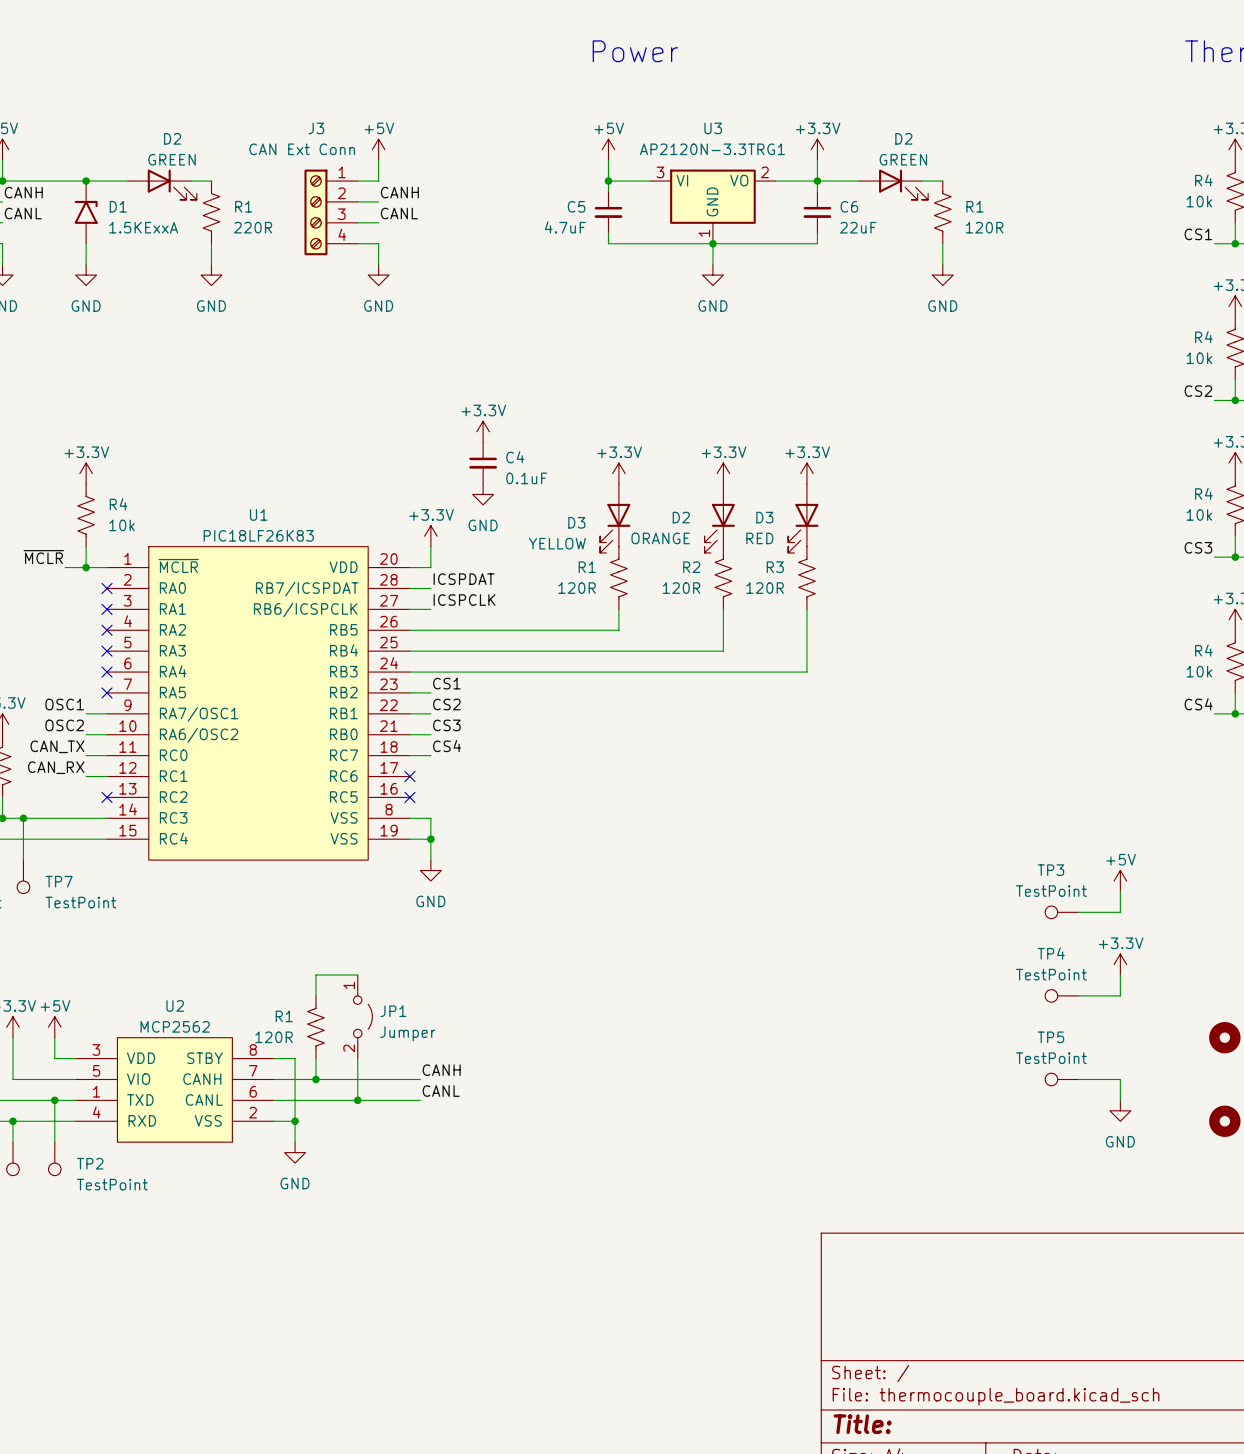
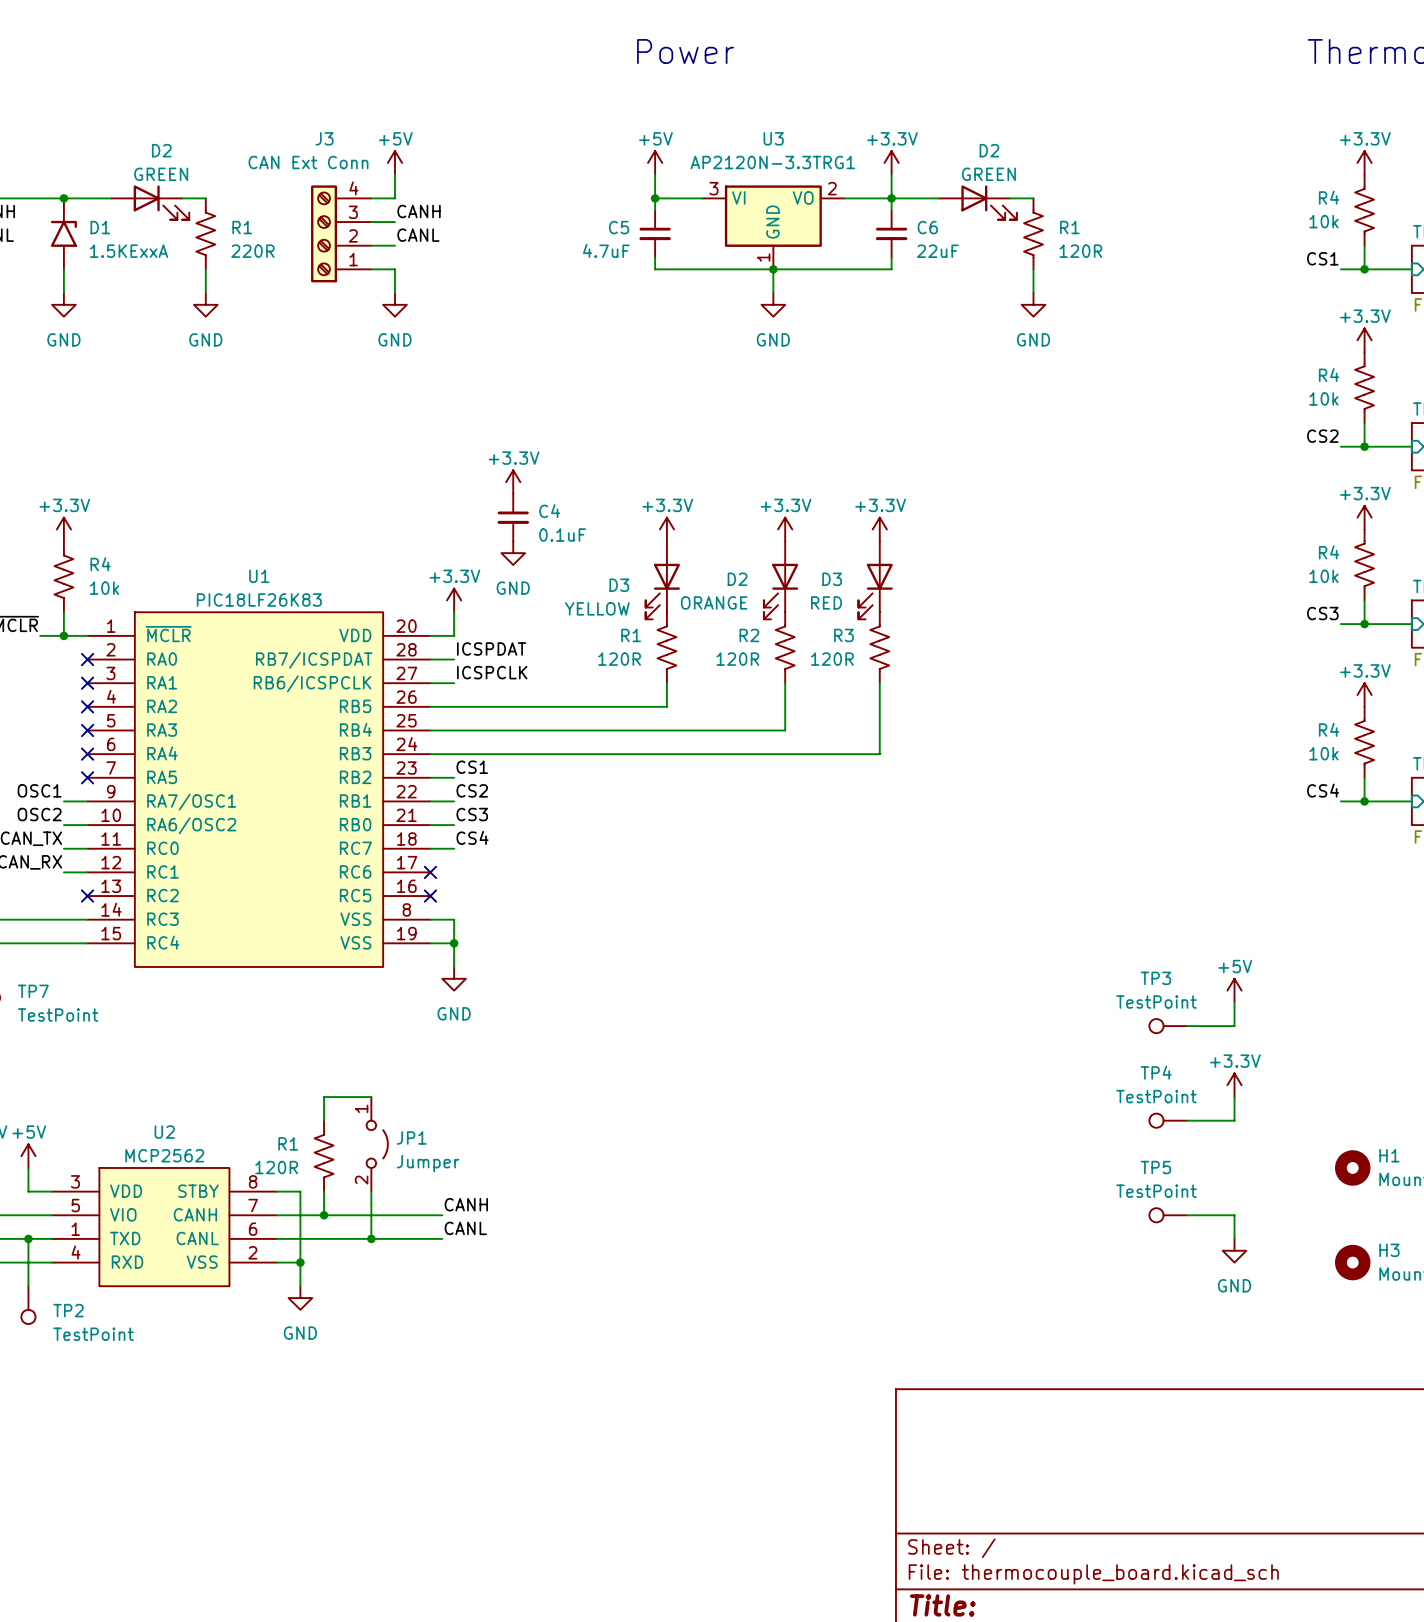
J3 flip: as is (315, 212) -> up-down (324, 233)

